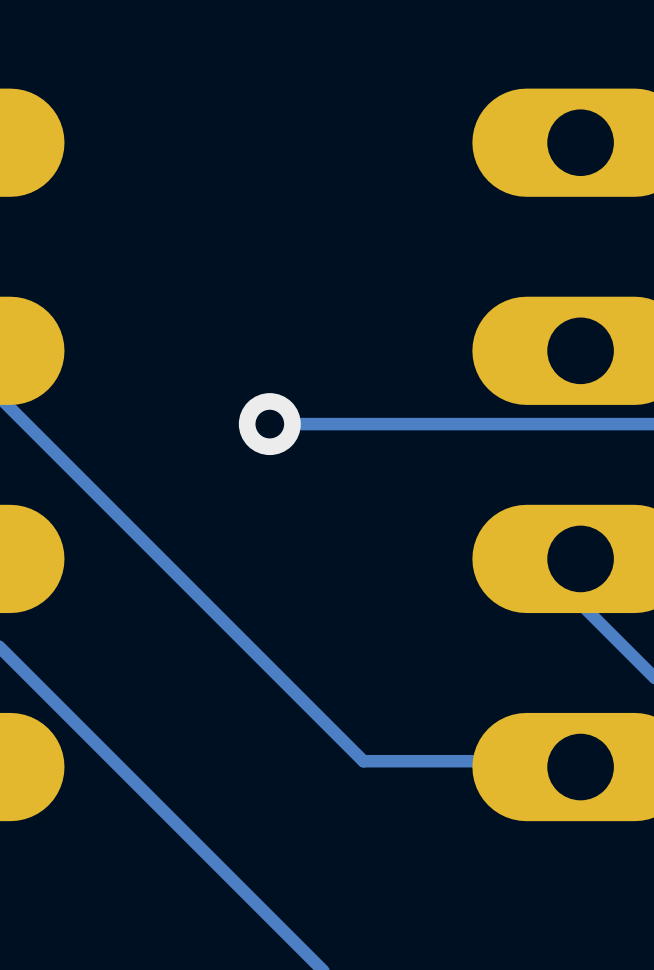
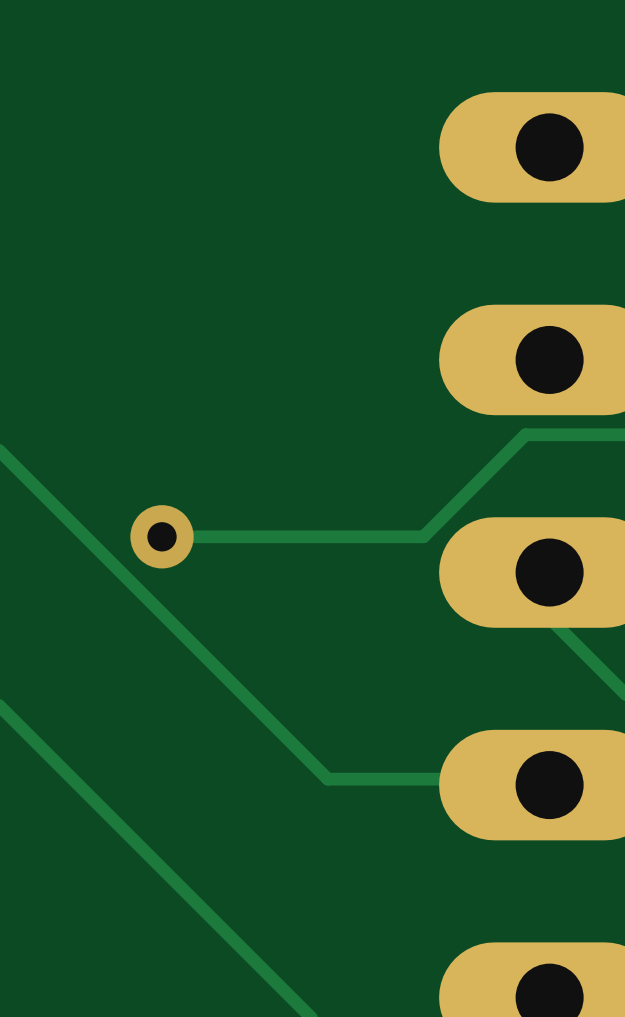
via position: (269, 424) -> (162, 536)
track: (557, 424) (269, 424) -> (525, 434) (423, 536) (162, 536)

